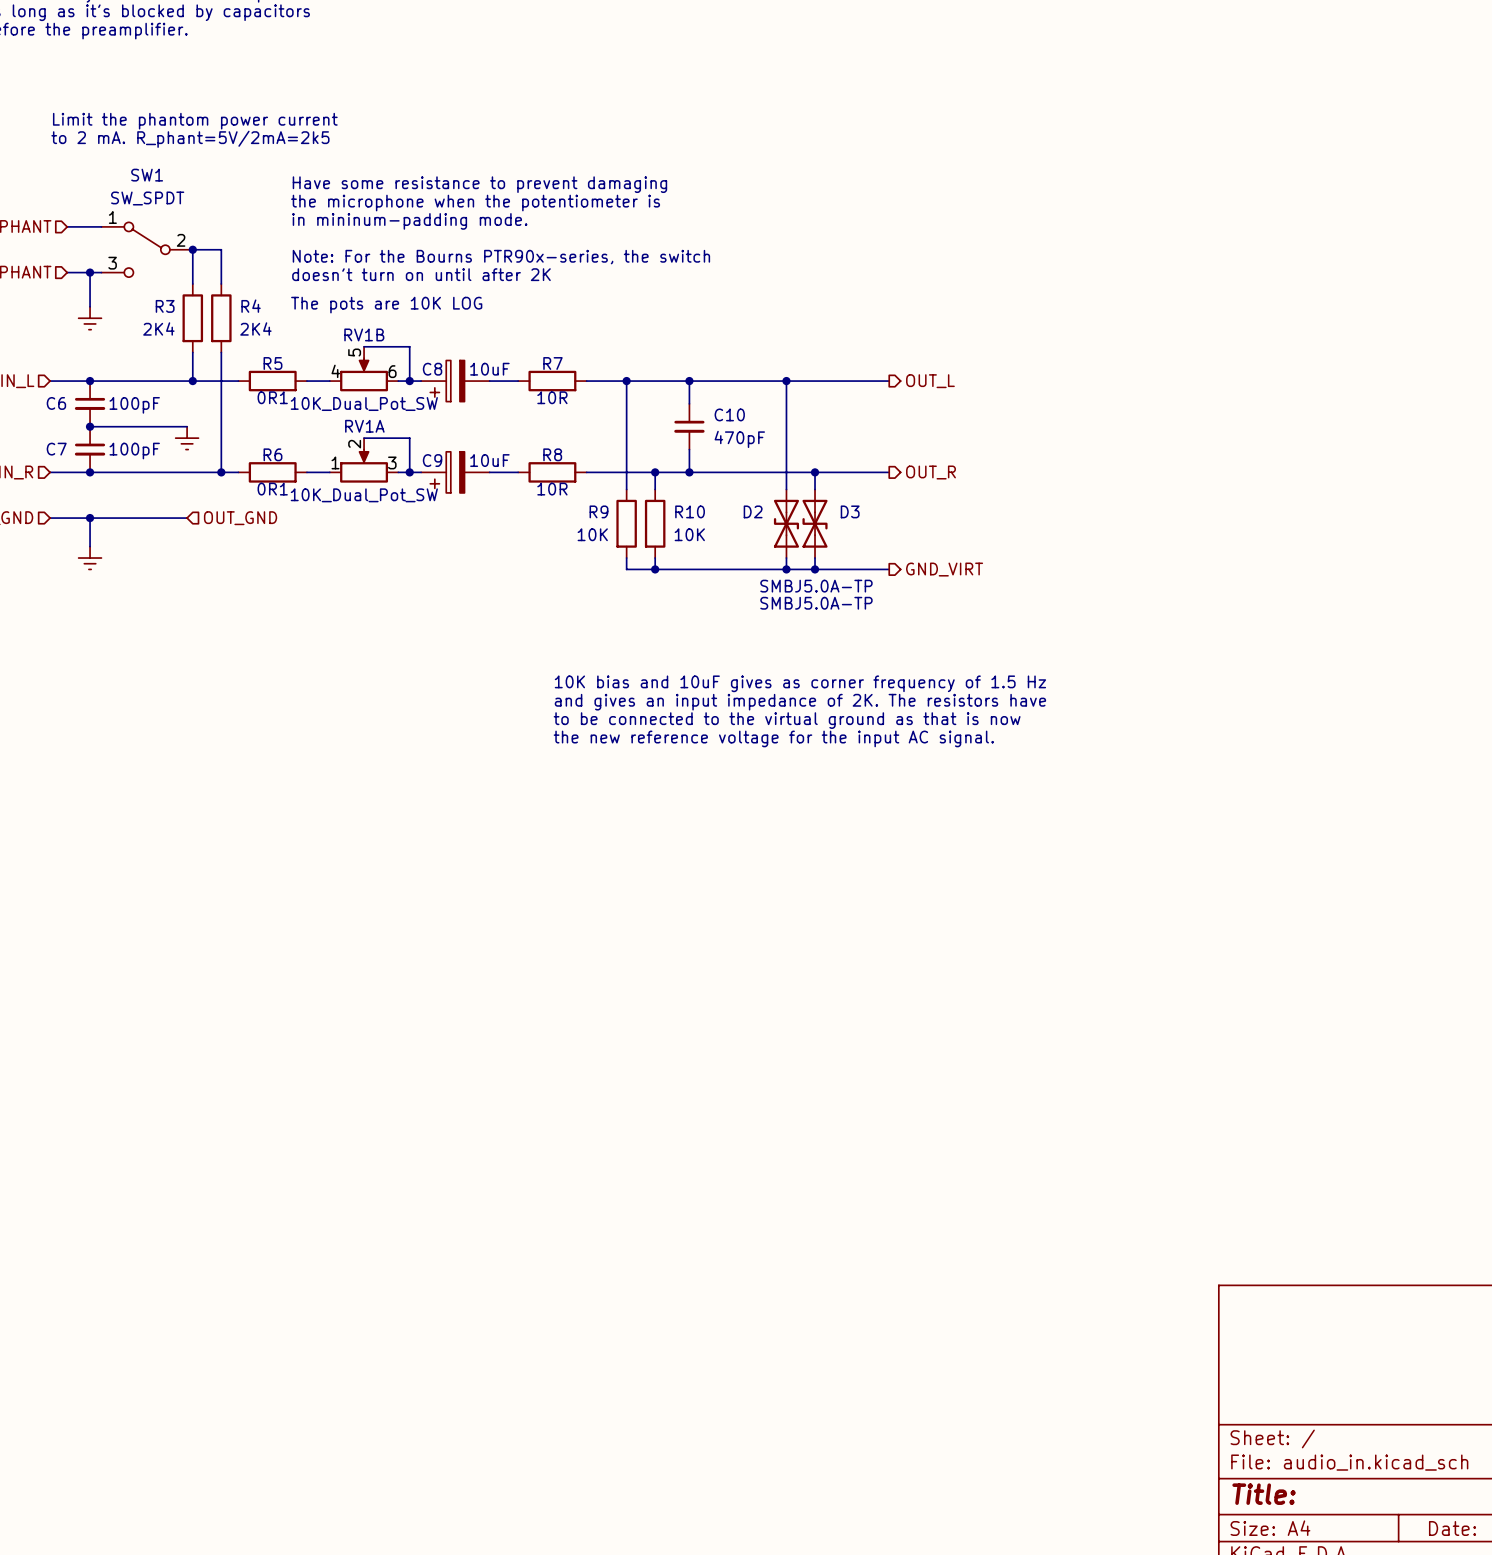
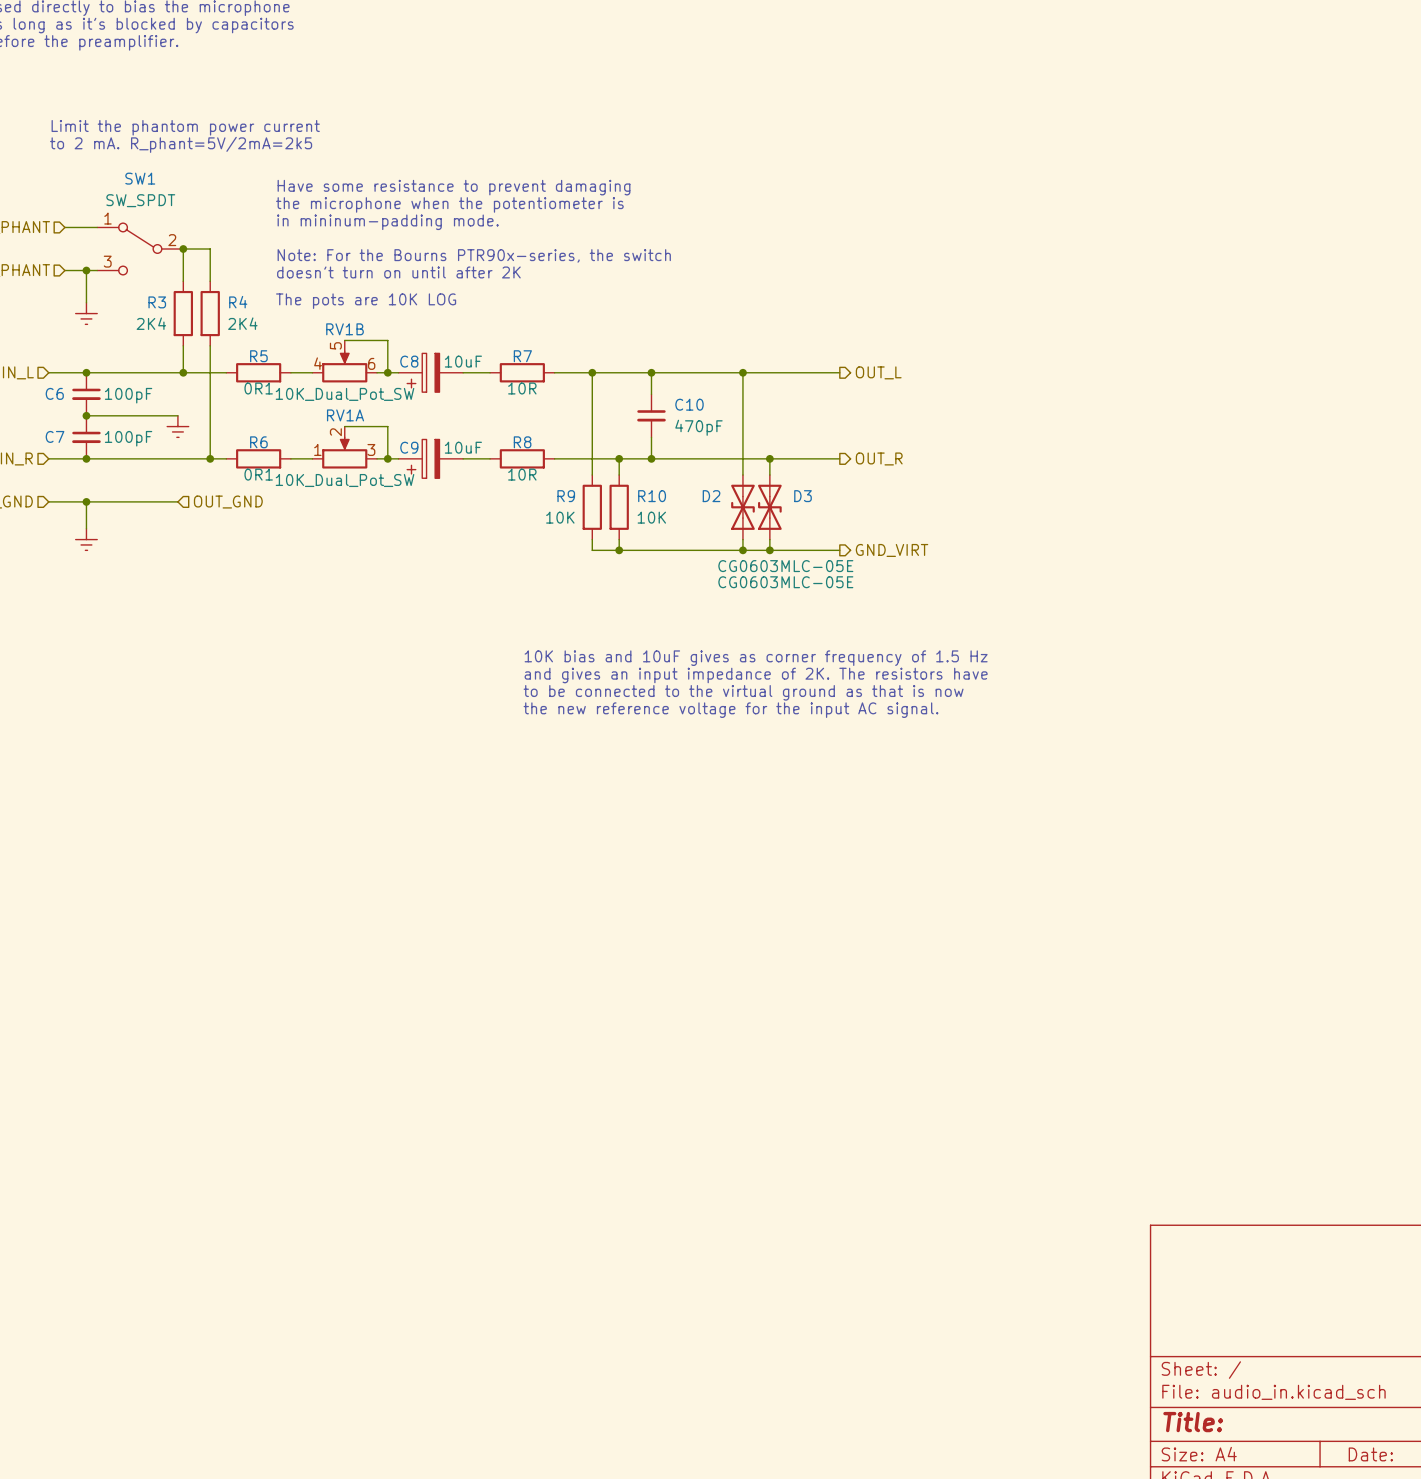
D3 value: SMBJ5.0A-TP (816, 586) -> CG0603MLC-05E (785, 566)
D2 value: SMBJ5.0A-TP (816, 603) -> CG0603MLC-05E (785, 582)

